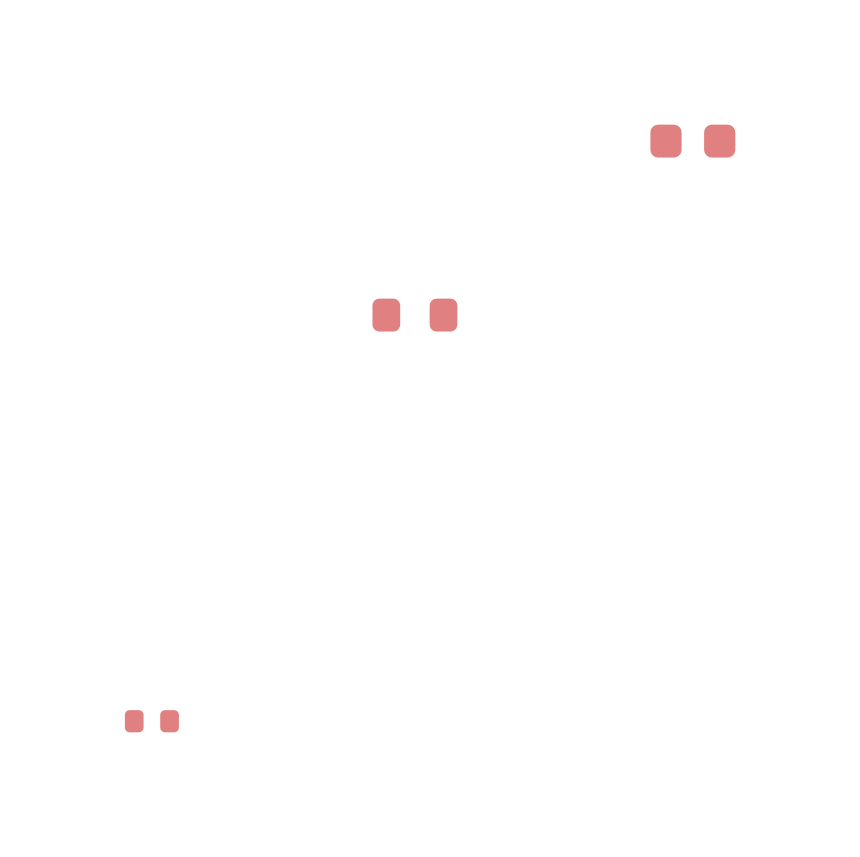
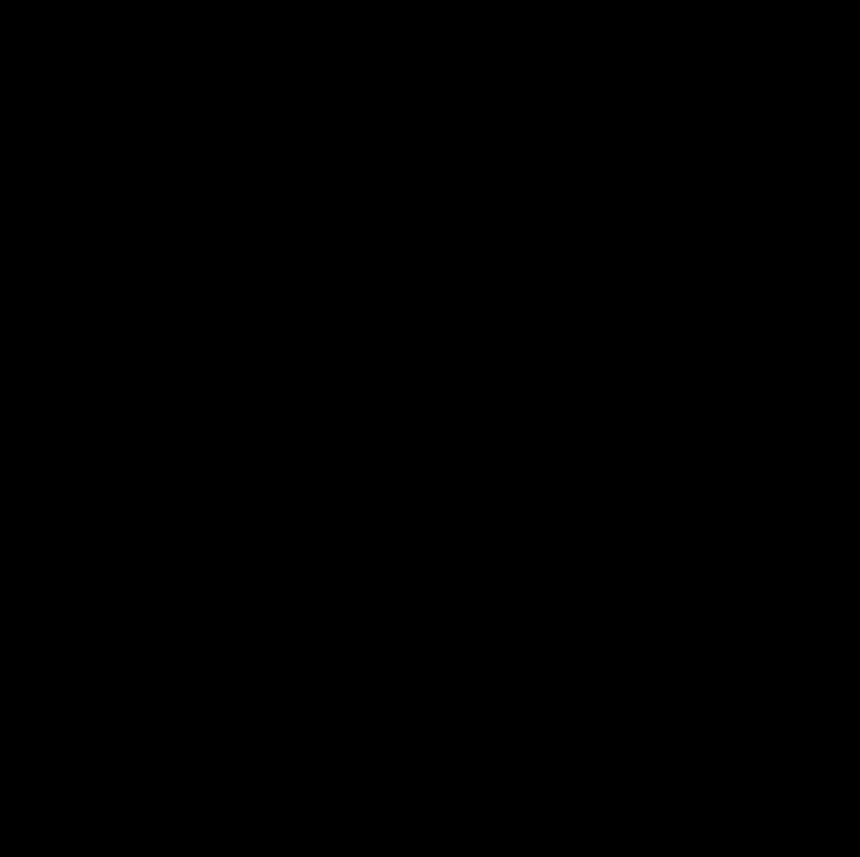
part: (692, 141) -> none
part: (414, 315) -> none
part: (151, 721) -> none

